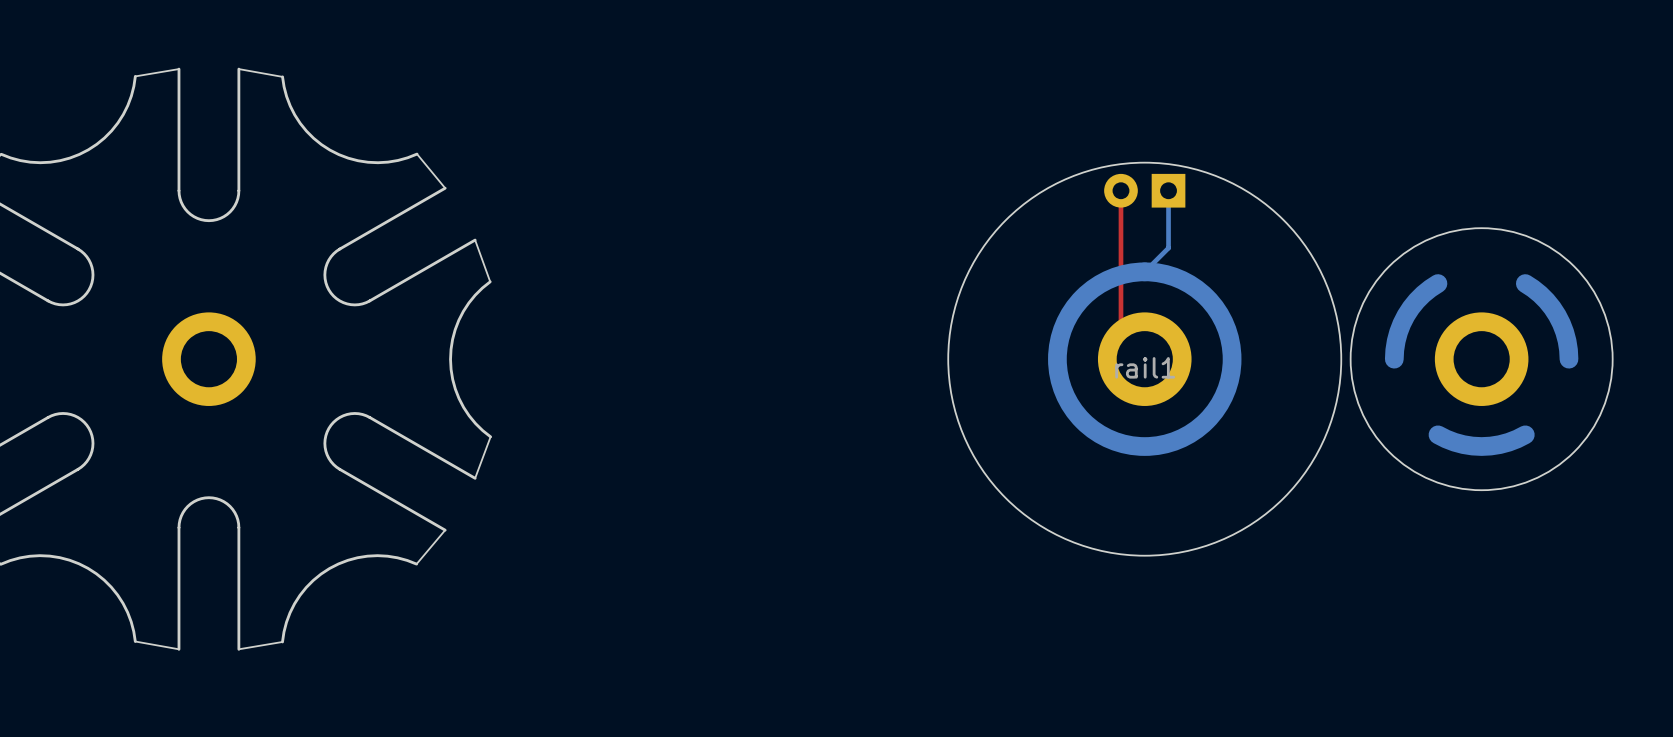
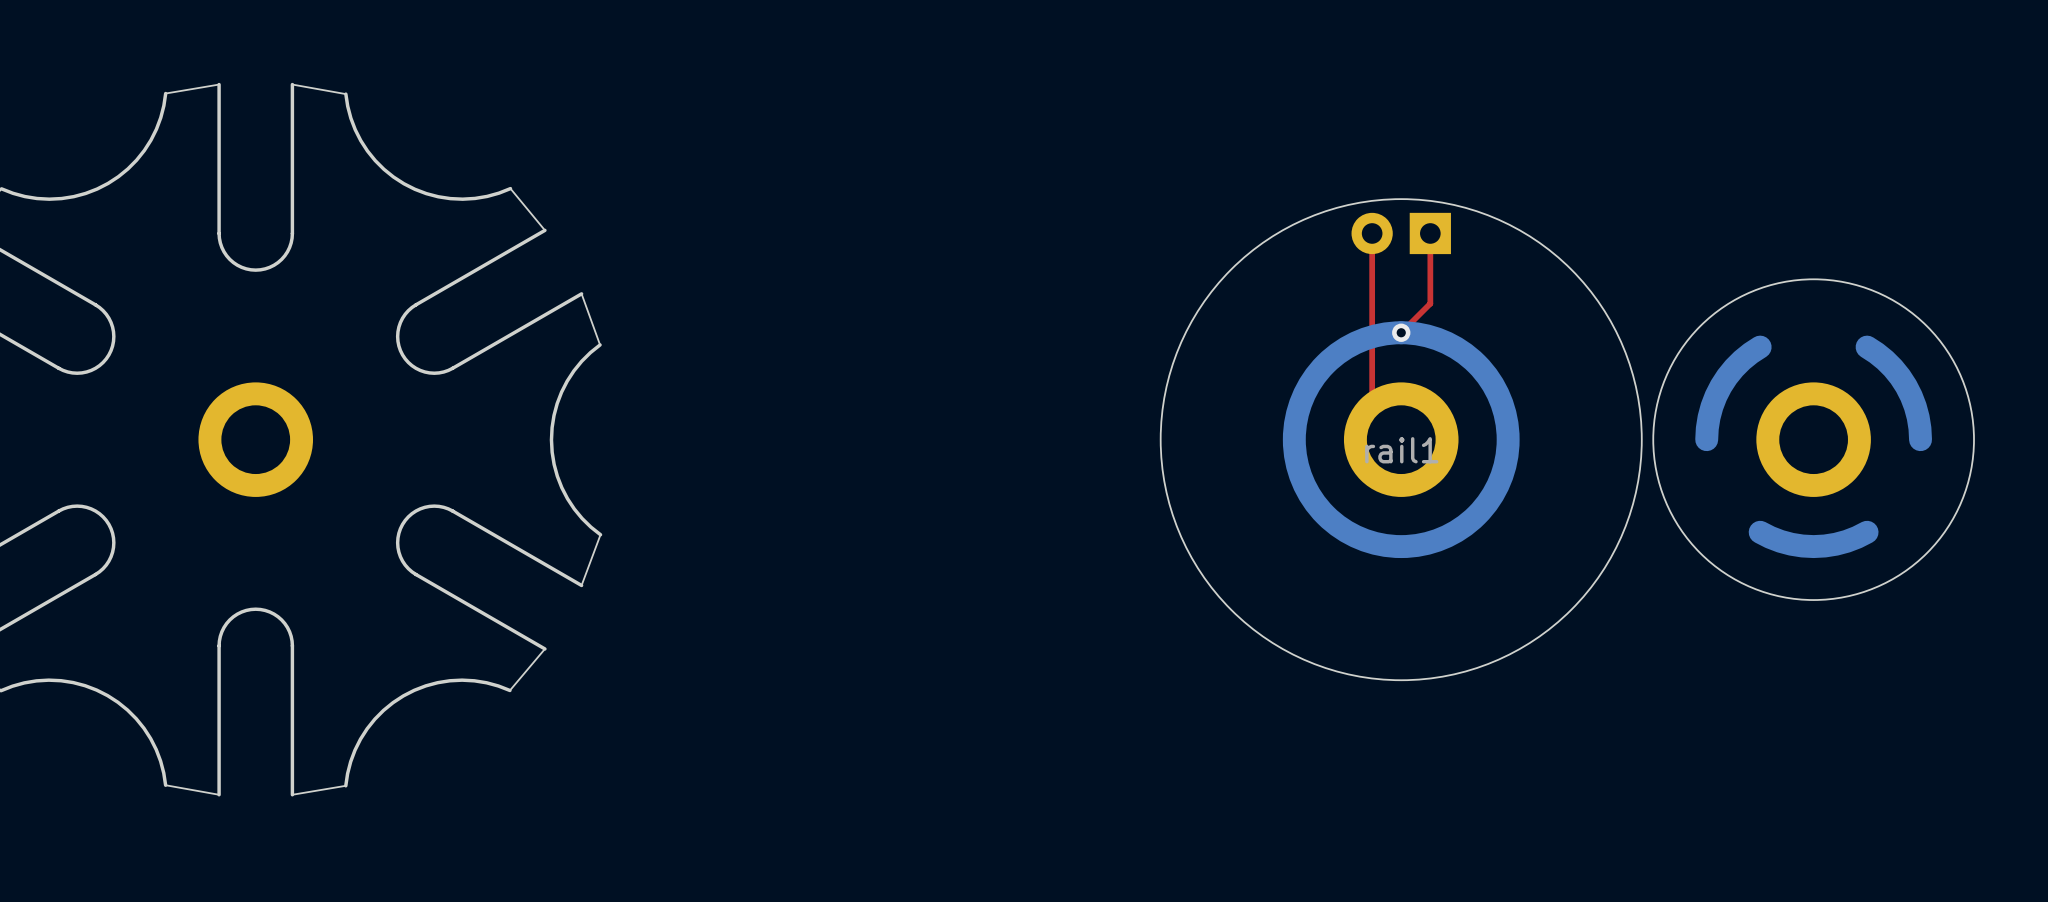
top track: none -> (1430, 233) (1430, 303) (1401, 332)
bottom track: (1168, 200) (1168, 248) (1144, 271) -> none
via: none -> (1401, 332)

